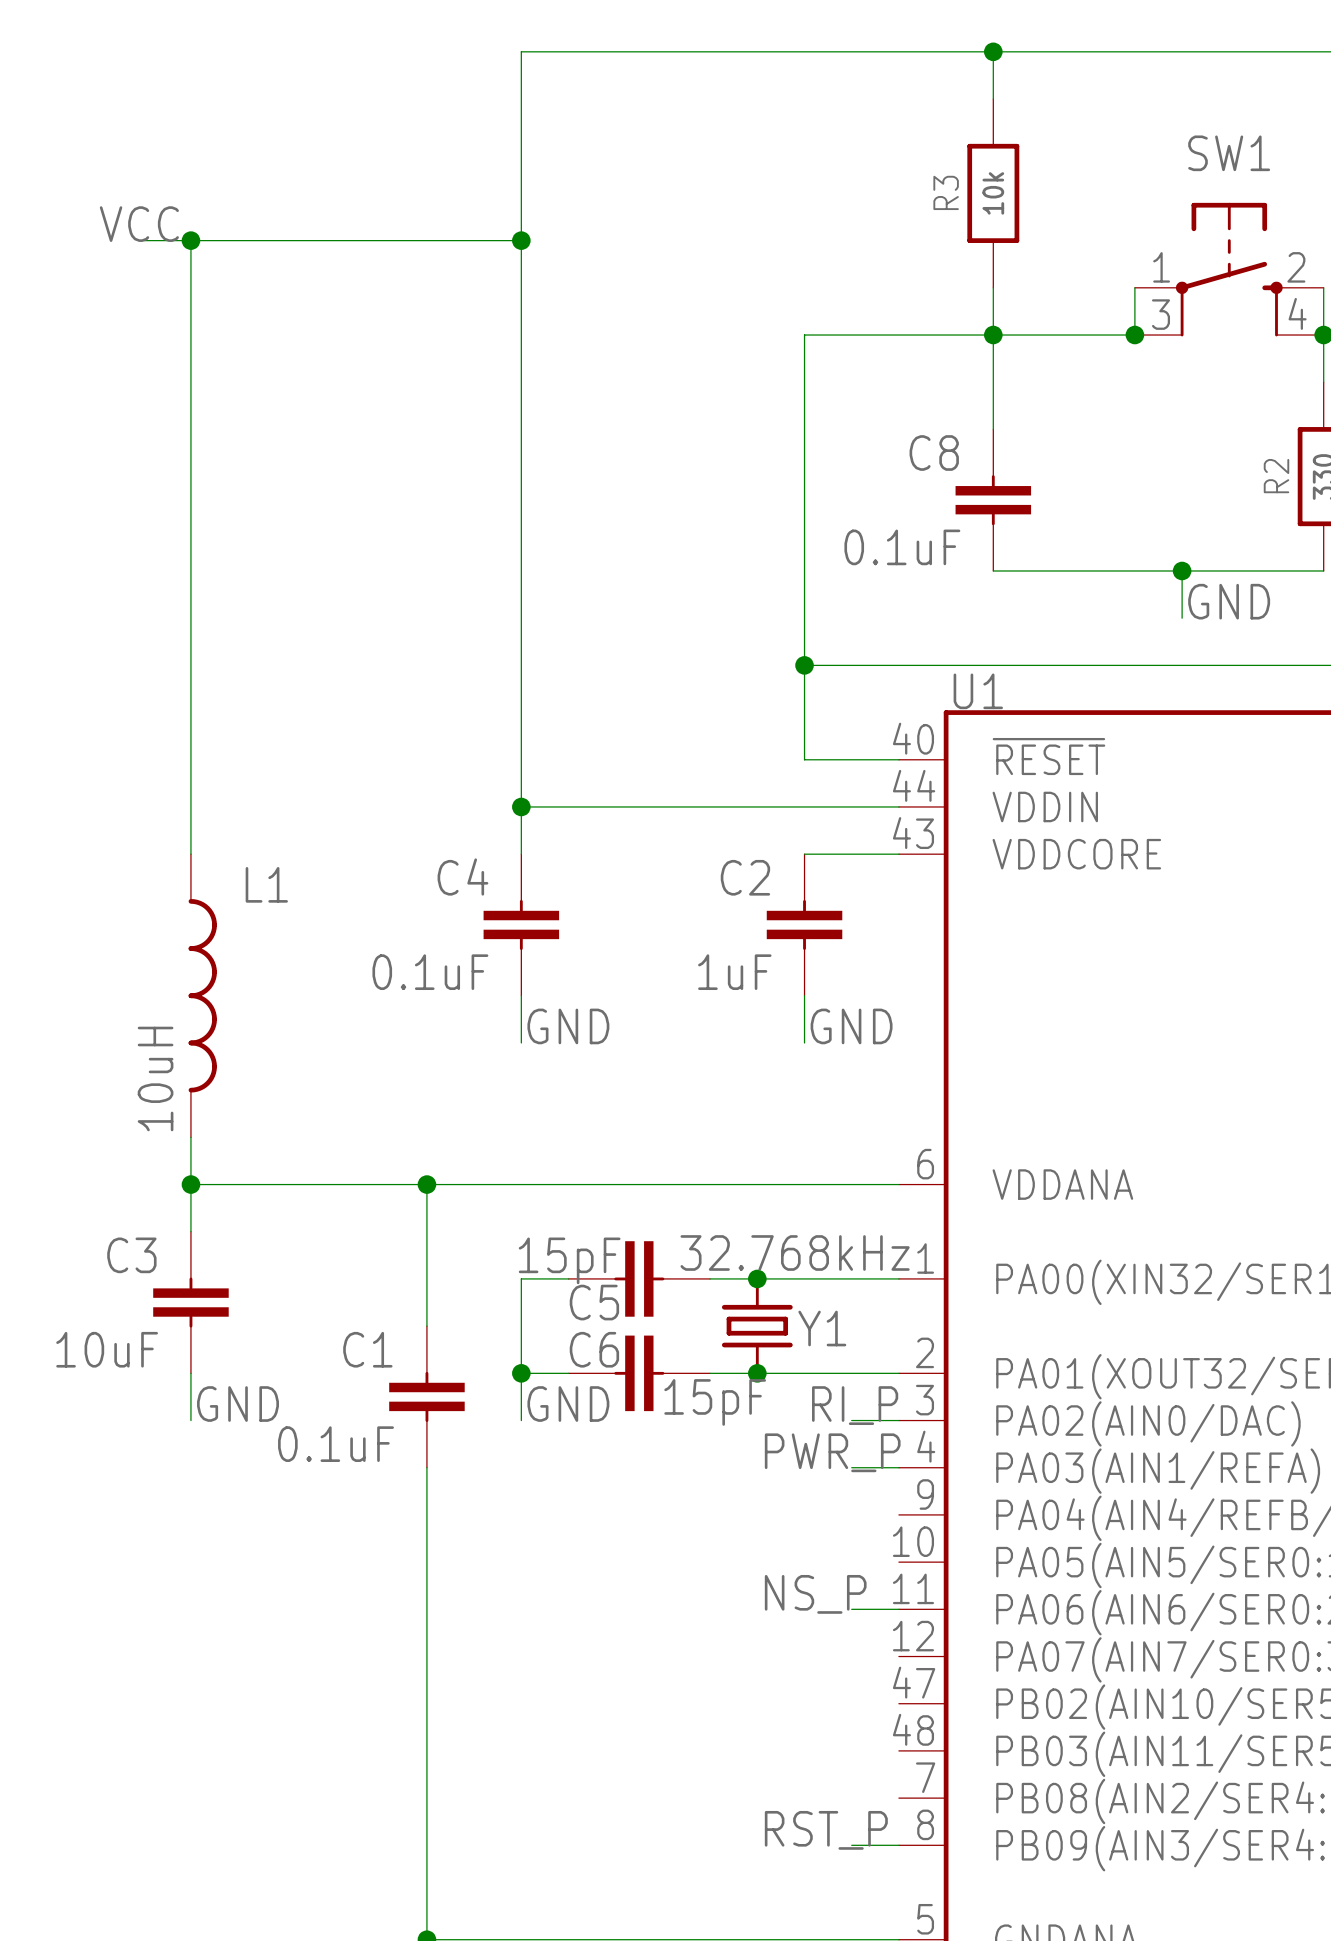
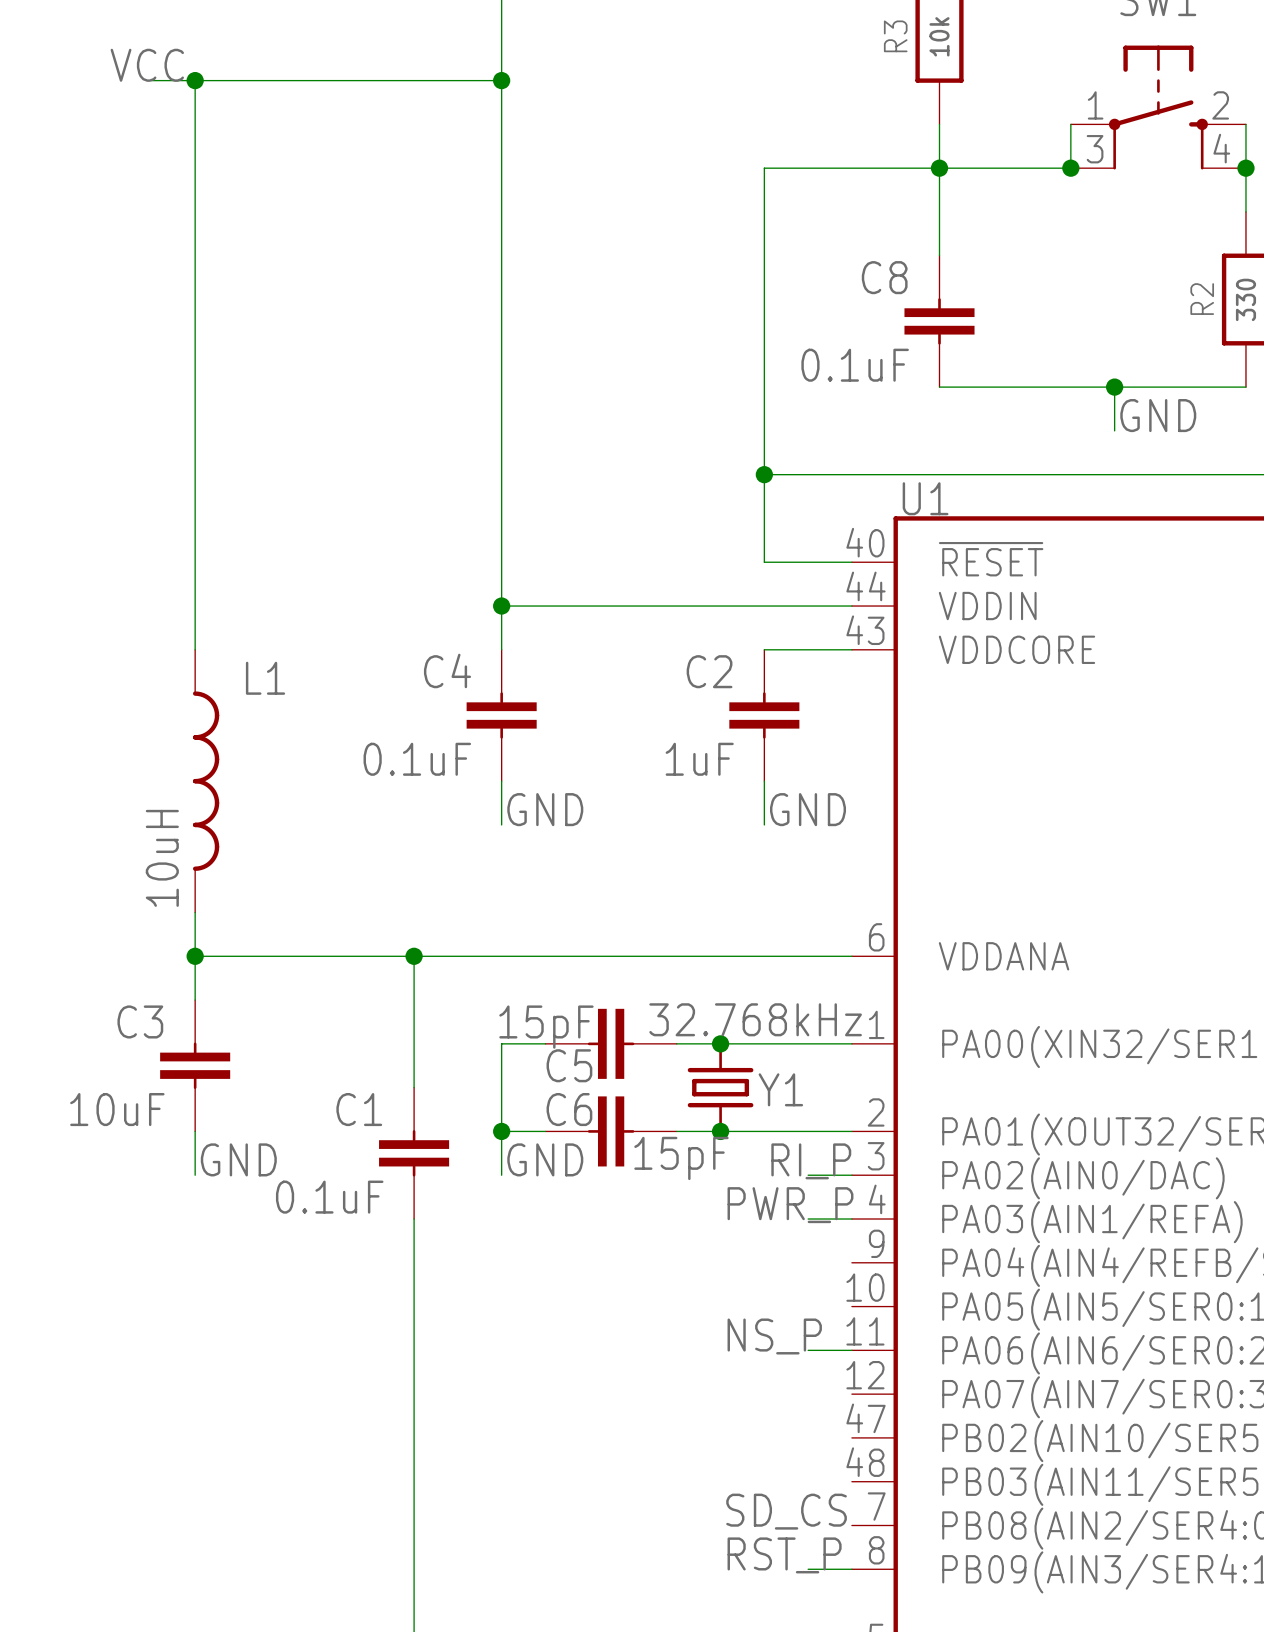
label: none -> SD_CS (786, 1511)

